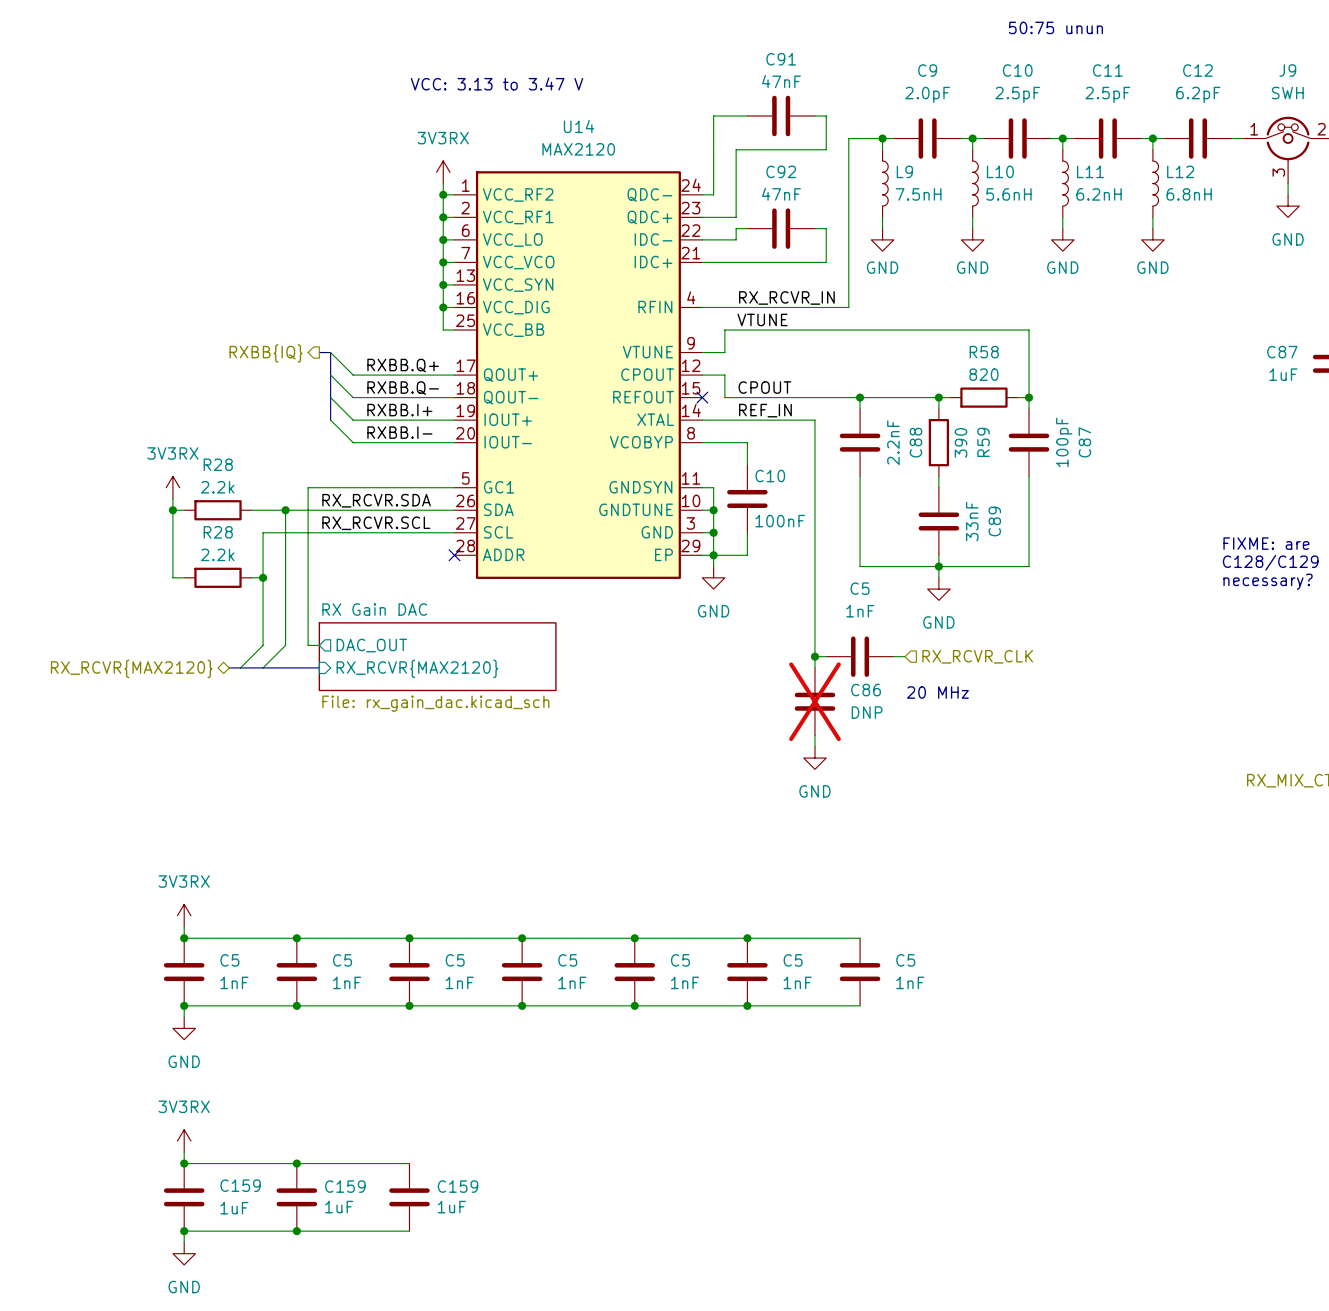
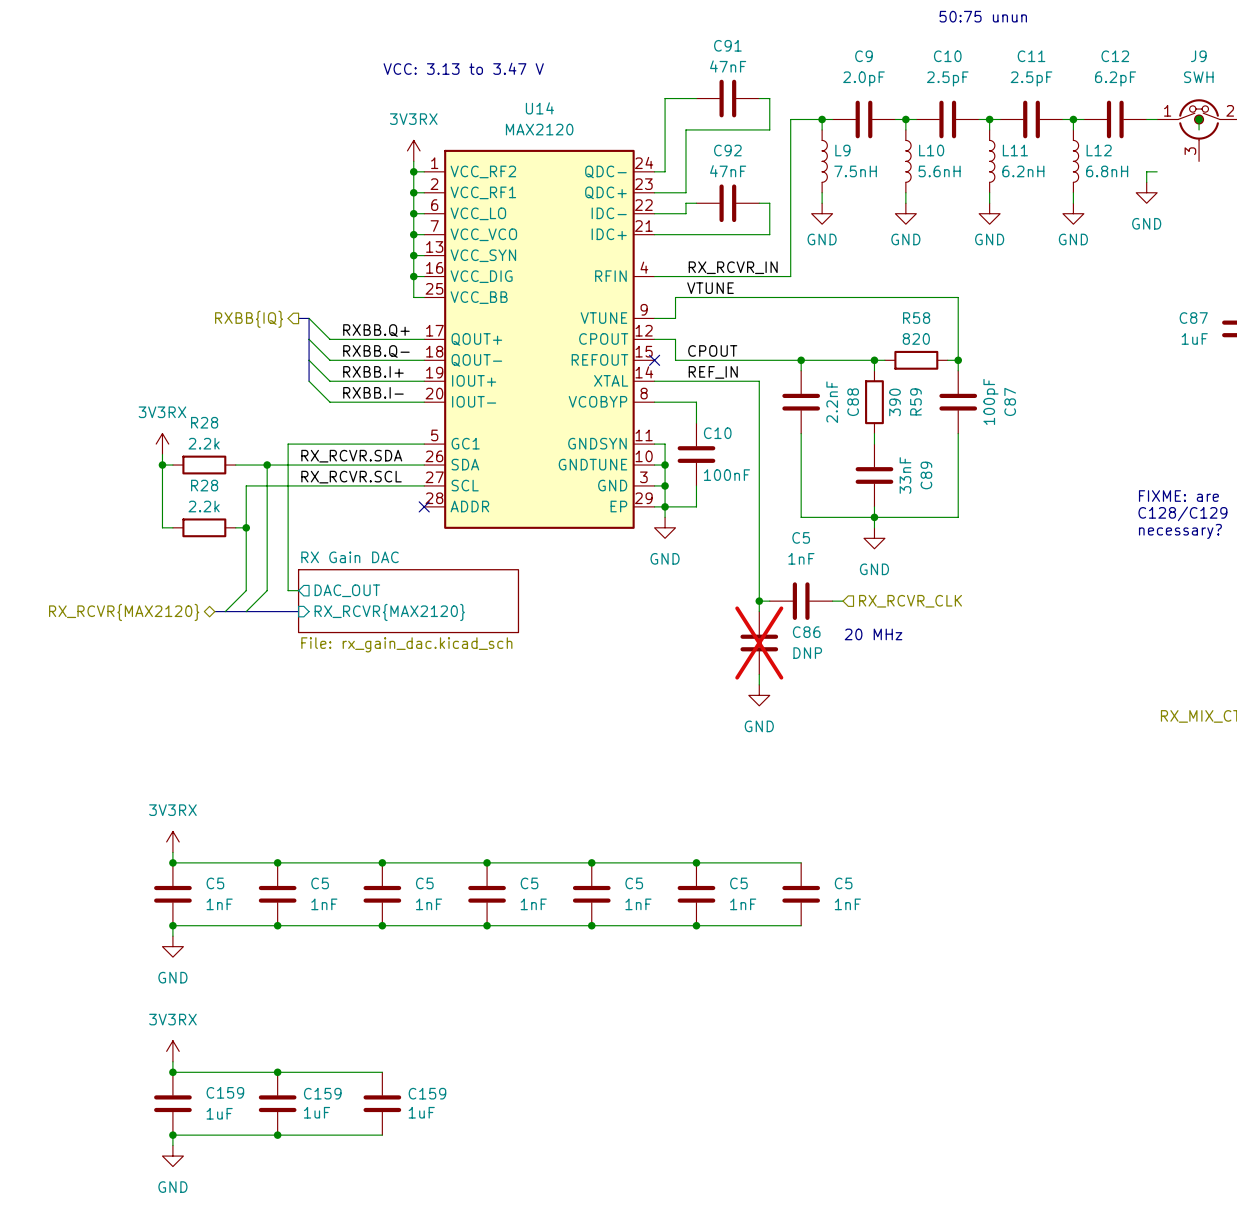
junction: none -> (1199, 119)
wire: (1288, 183) (1288, 194) -> (1199, 119) (1199, 129)
wire: none -> (1157, 171) (1146, 171) (1146, 182)
power symbol position: GND (1288, 206) -> GND (1146, 192)

